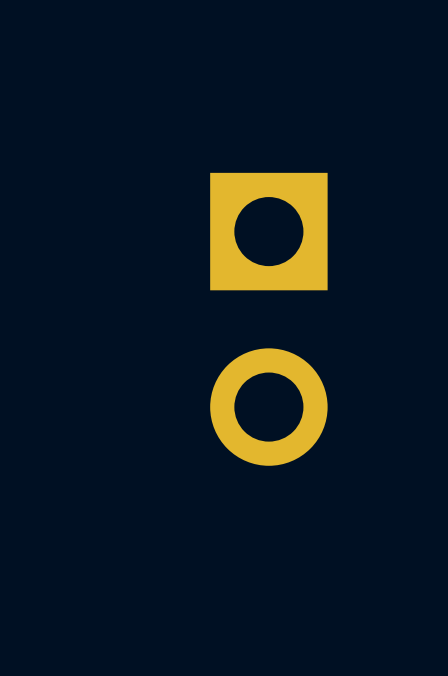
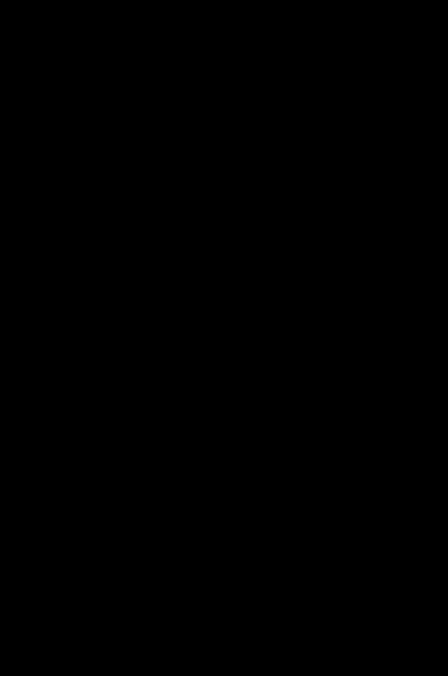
part: (268, 319) -> none

